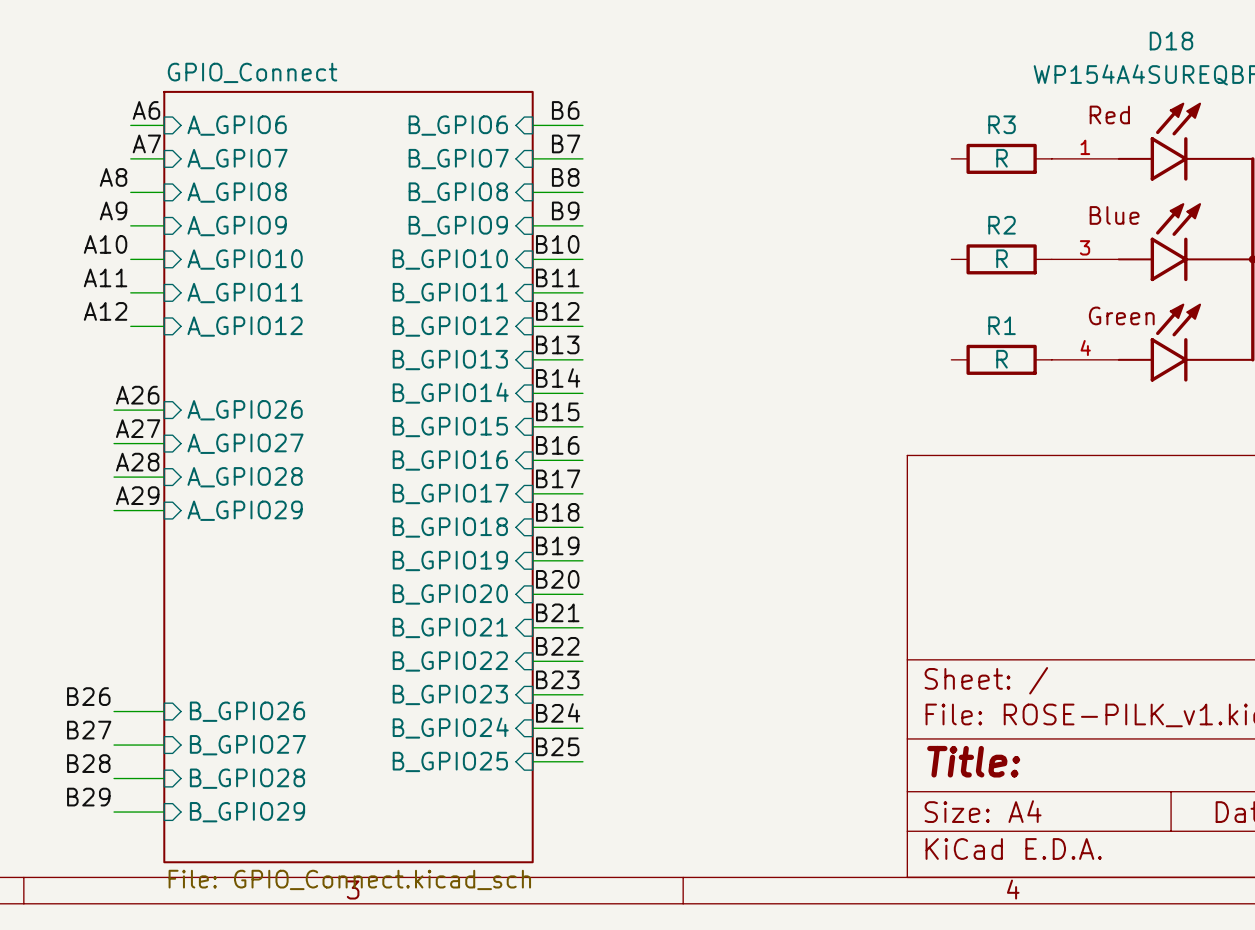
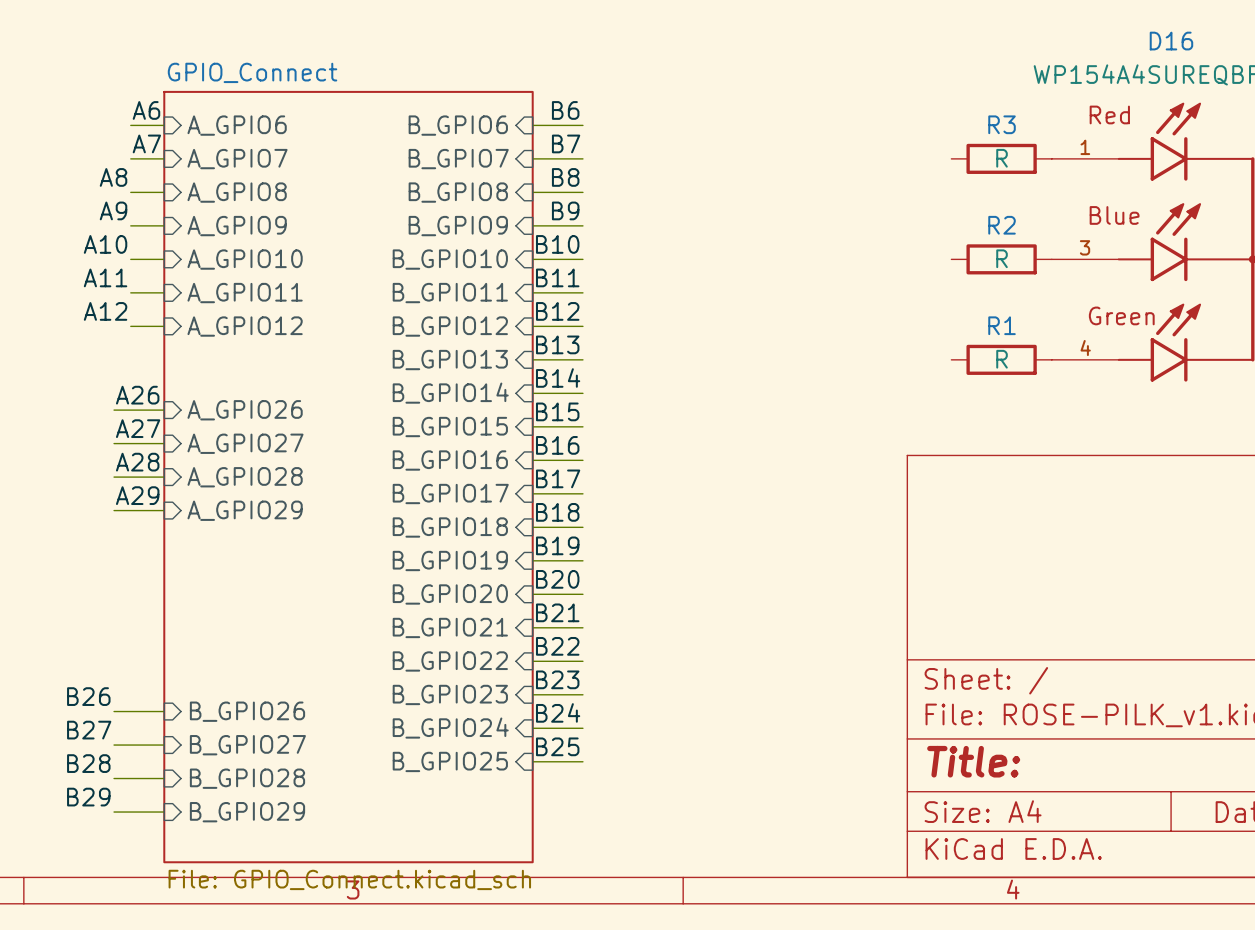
D18 name: D18 (1171, 41) -> D16 (1171, 41)

